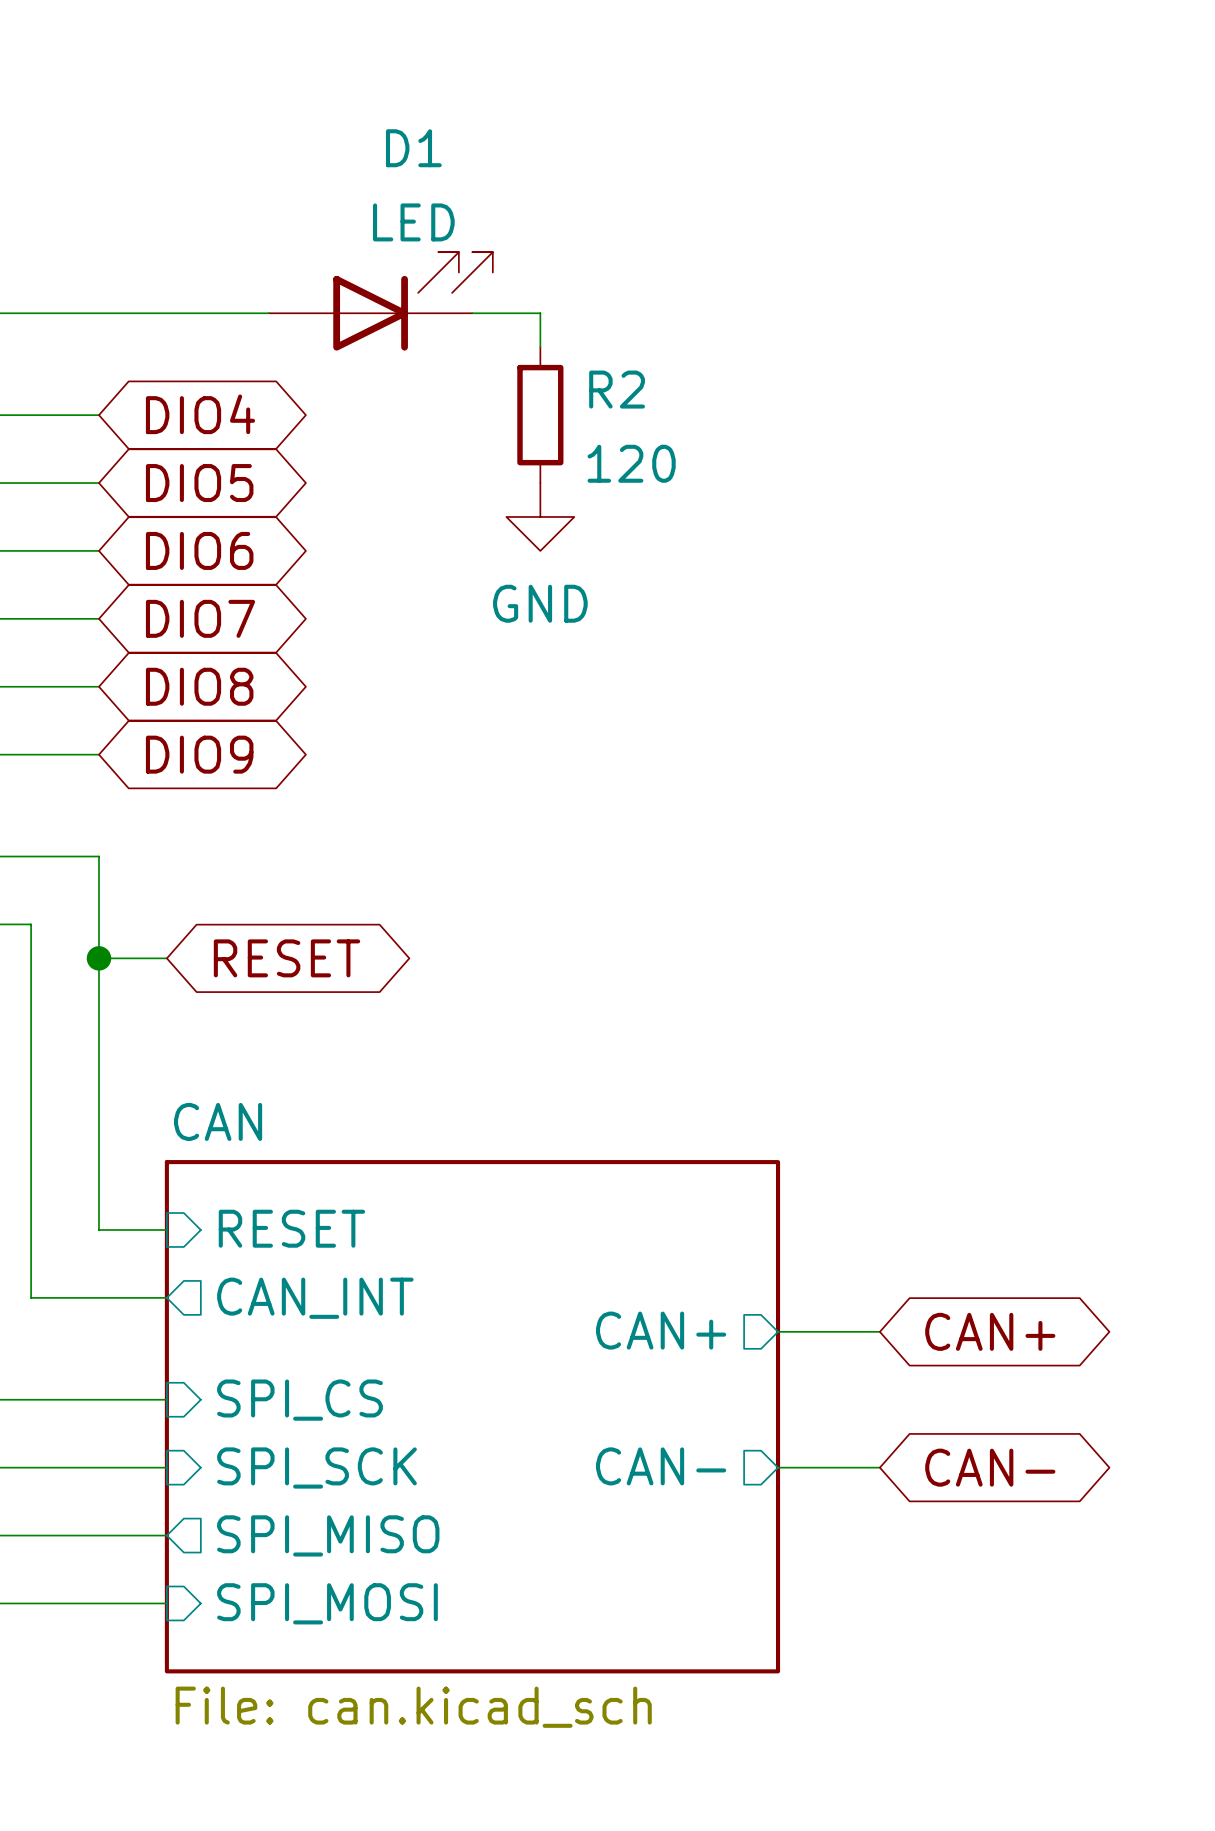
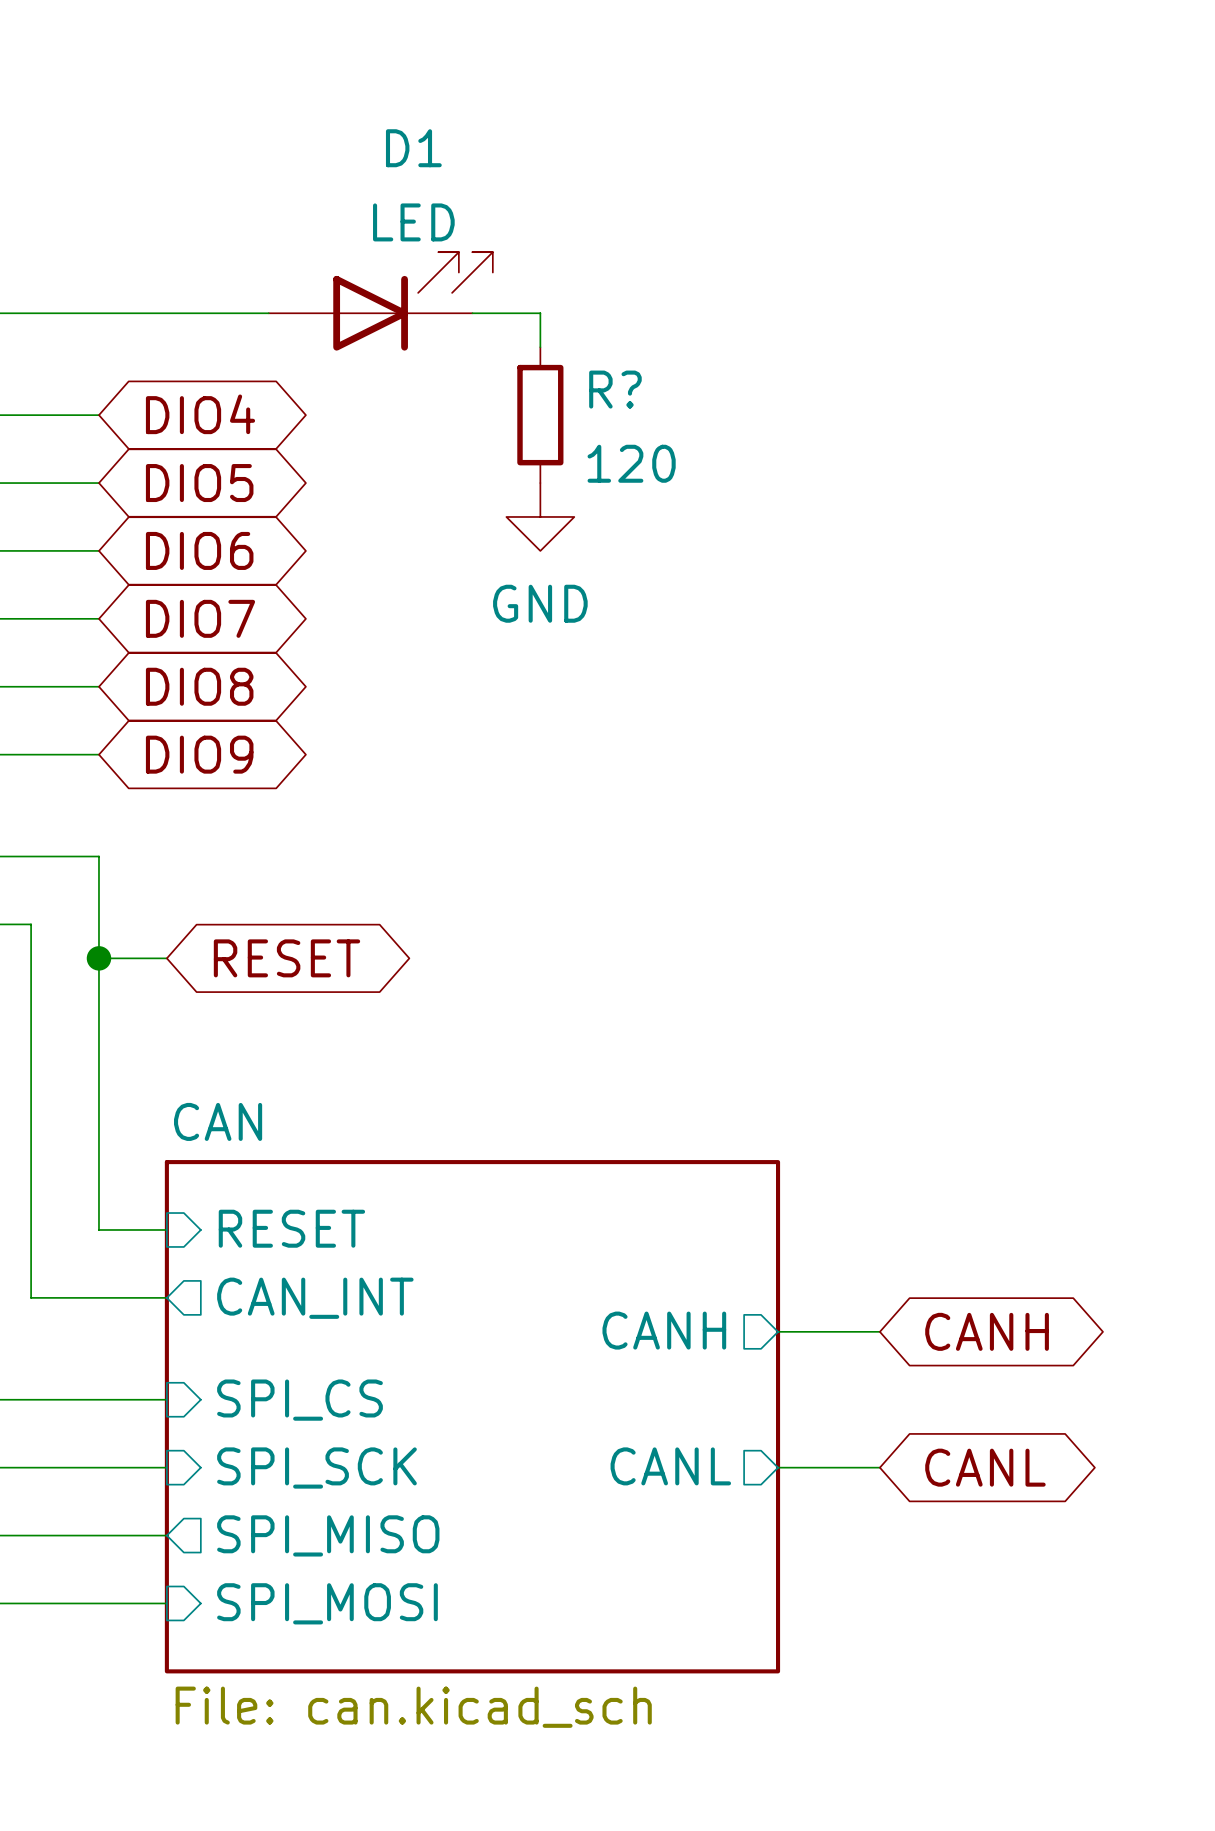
R2 name: R2 (617, 389) -> R? (615, 389)
sheet pin: CAN+ (661, 1330) -> CANH (664, 1330)
global label: CAN+ (990, 1331) -> CANH (987, 1331)
sheet pin: CAN- (661, 1466) -> CANL (670, 1466)
global label: CAN- (990, 1467) -> CANL (985, 1467)

